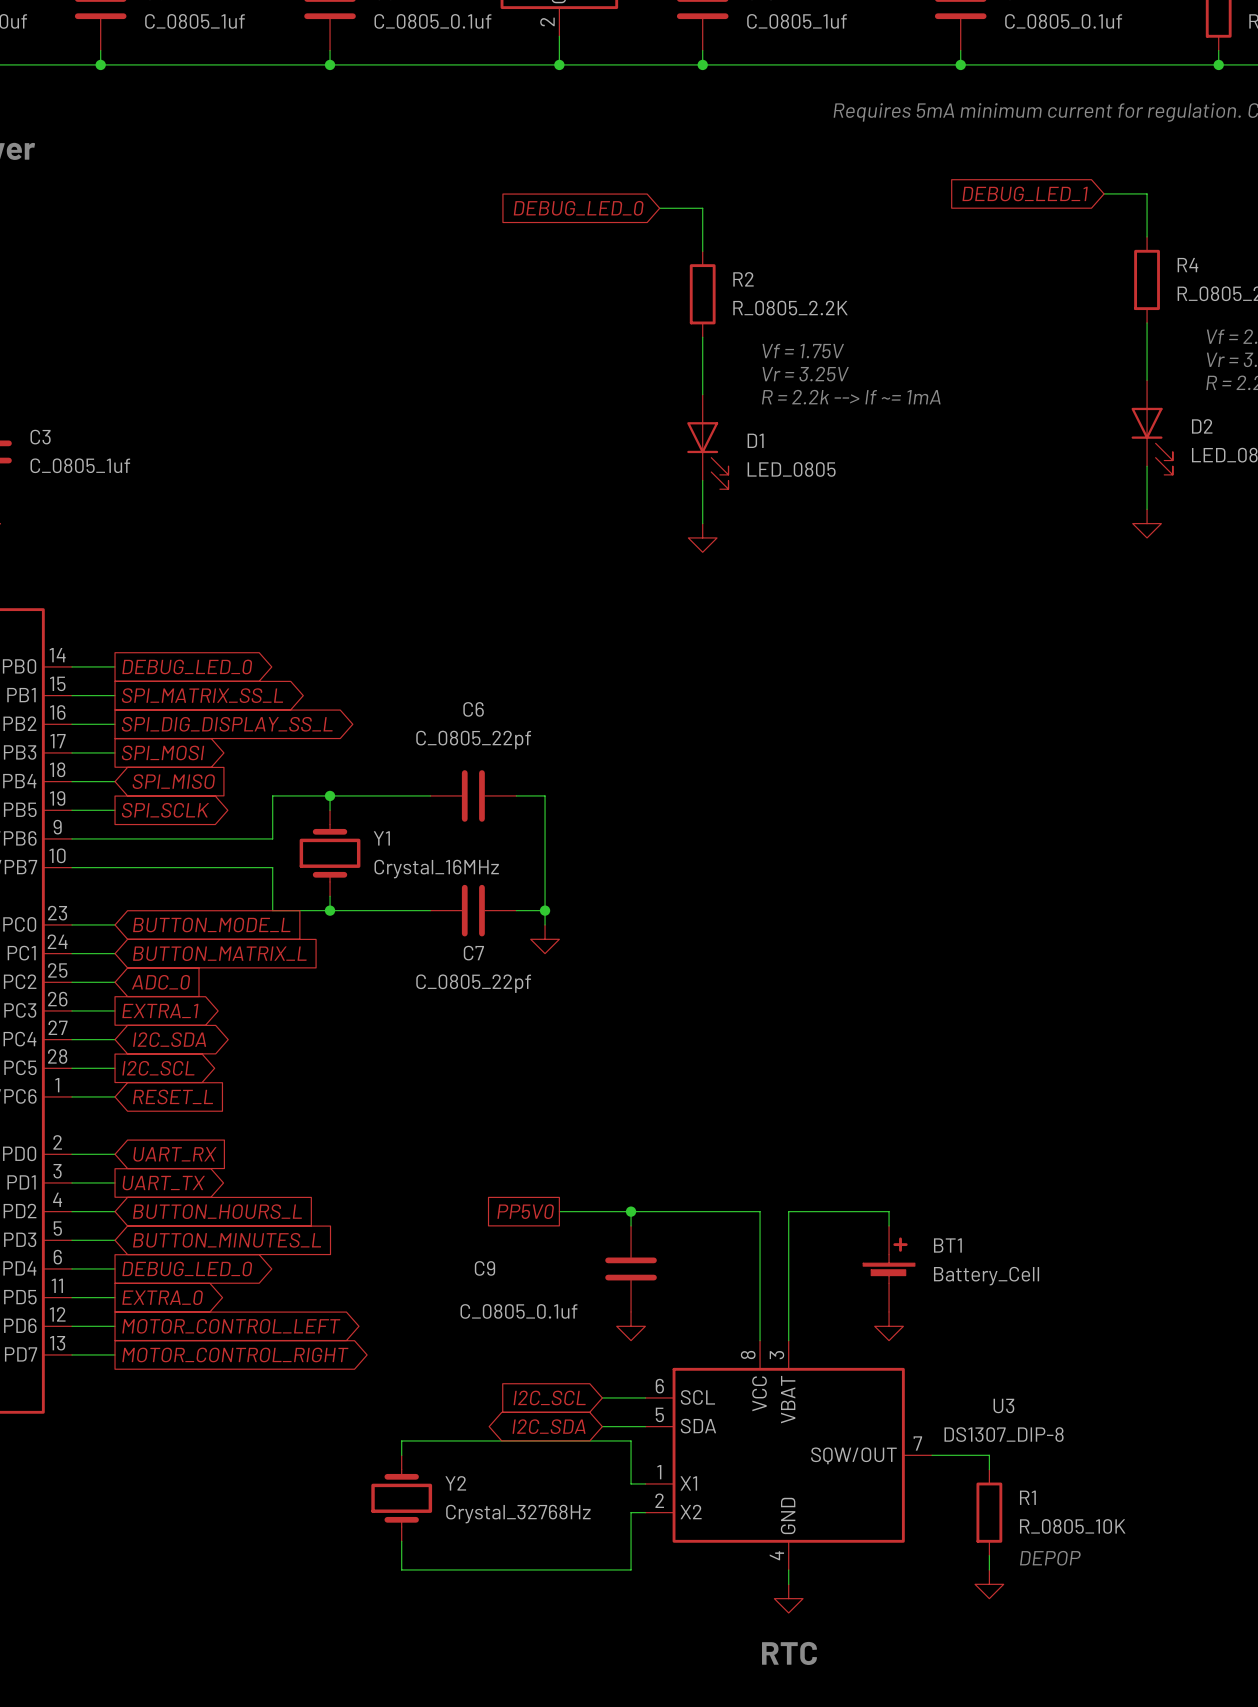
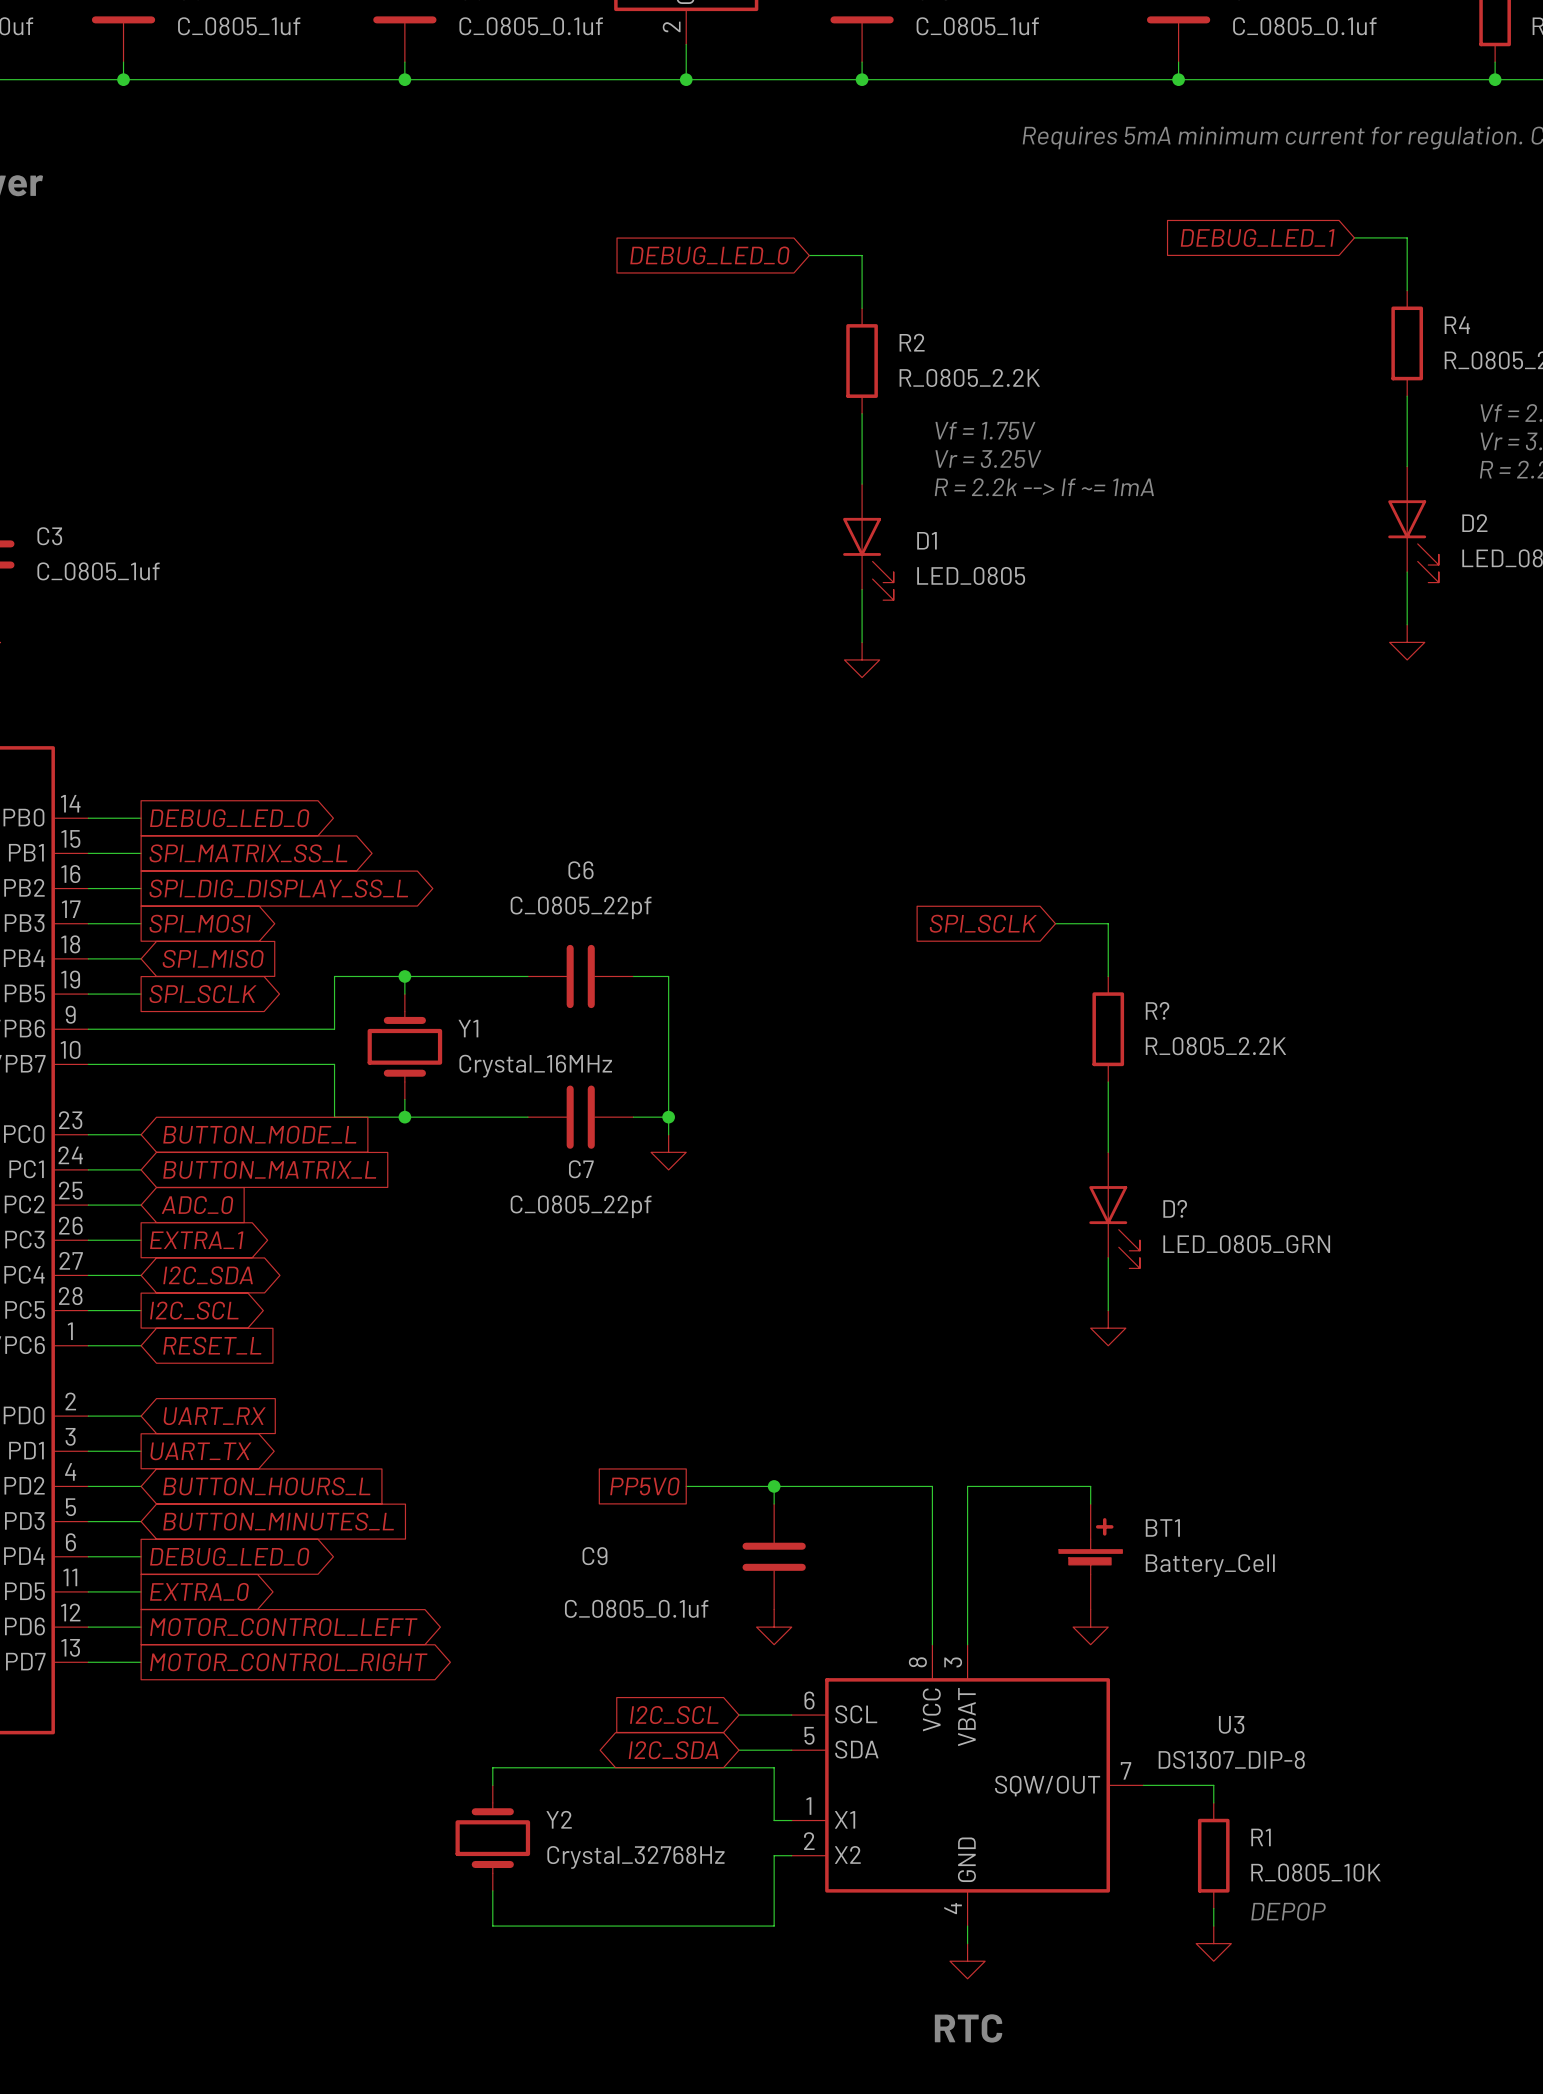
global label: none -> SPI_SCLK (983, 923)
wire: none -> (1055, 923) (1108, 923) (1108, 976)
R?: none -> R_0805_2.2K (1108, 1029)
wire: none -> (1108, 1081) (1108, 1152)
D?: none -> LED_0805_GRN (1114, 1210)
wire: none -> (1108, 1257) (1108, 1310)
power symbol: none -> (1108, 1328)

